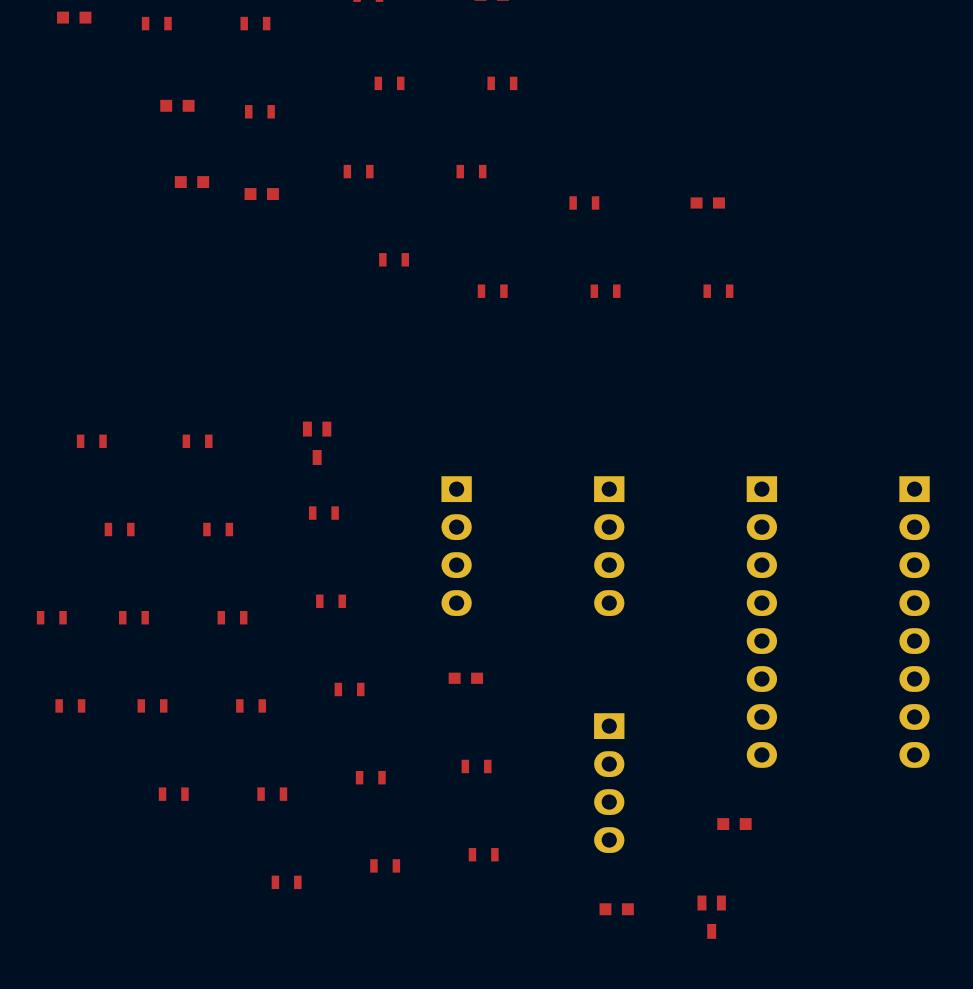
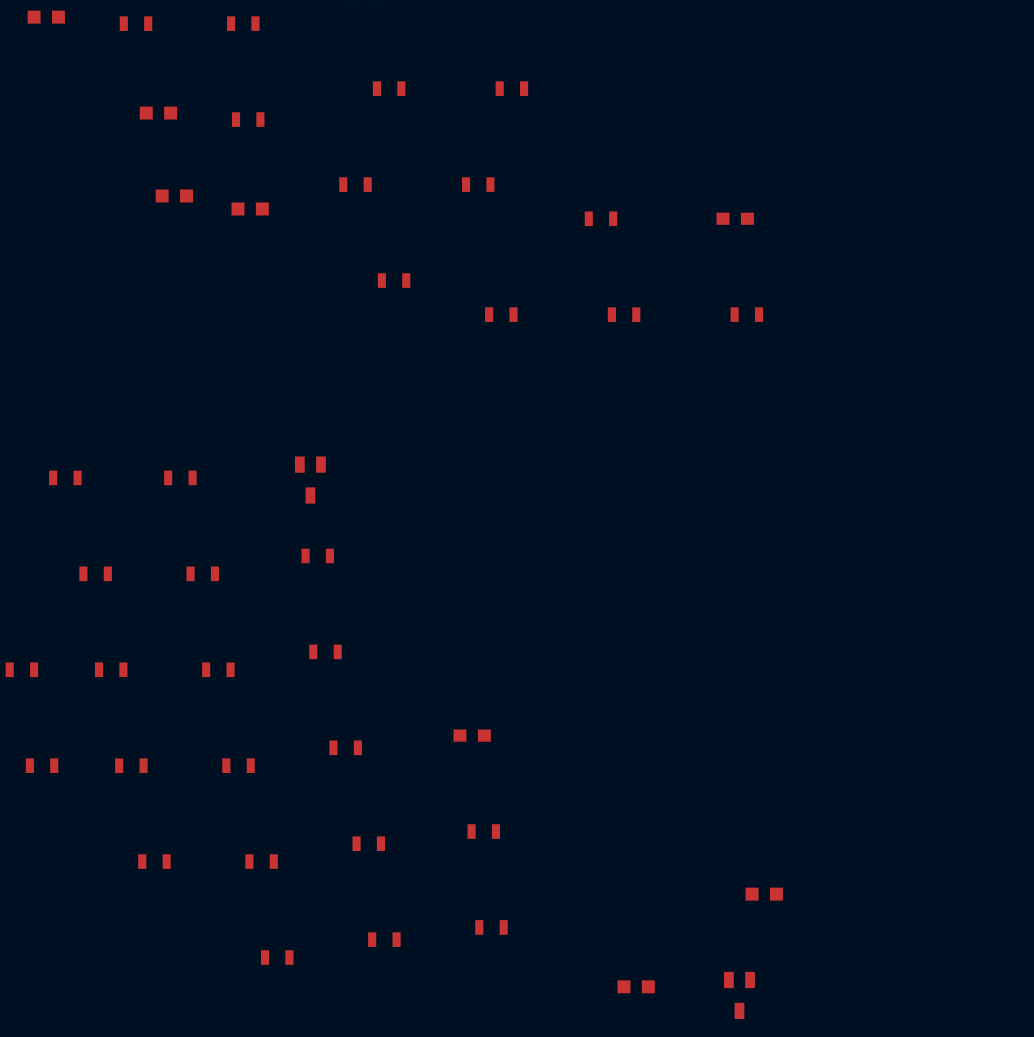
part: (456, 546) -> none
part: (609, 546) -> none
part: (761, 622) -> none
part: (914, 622) -> none
part: (609, 783) -> none

